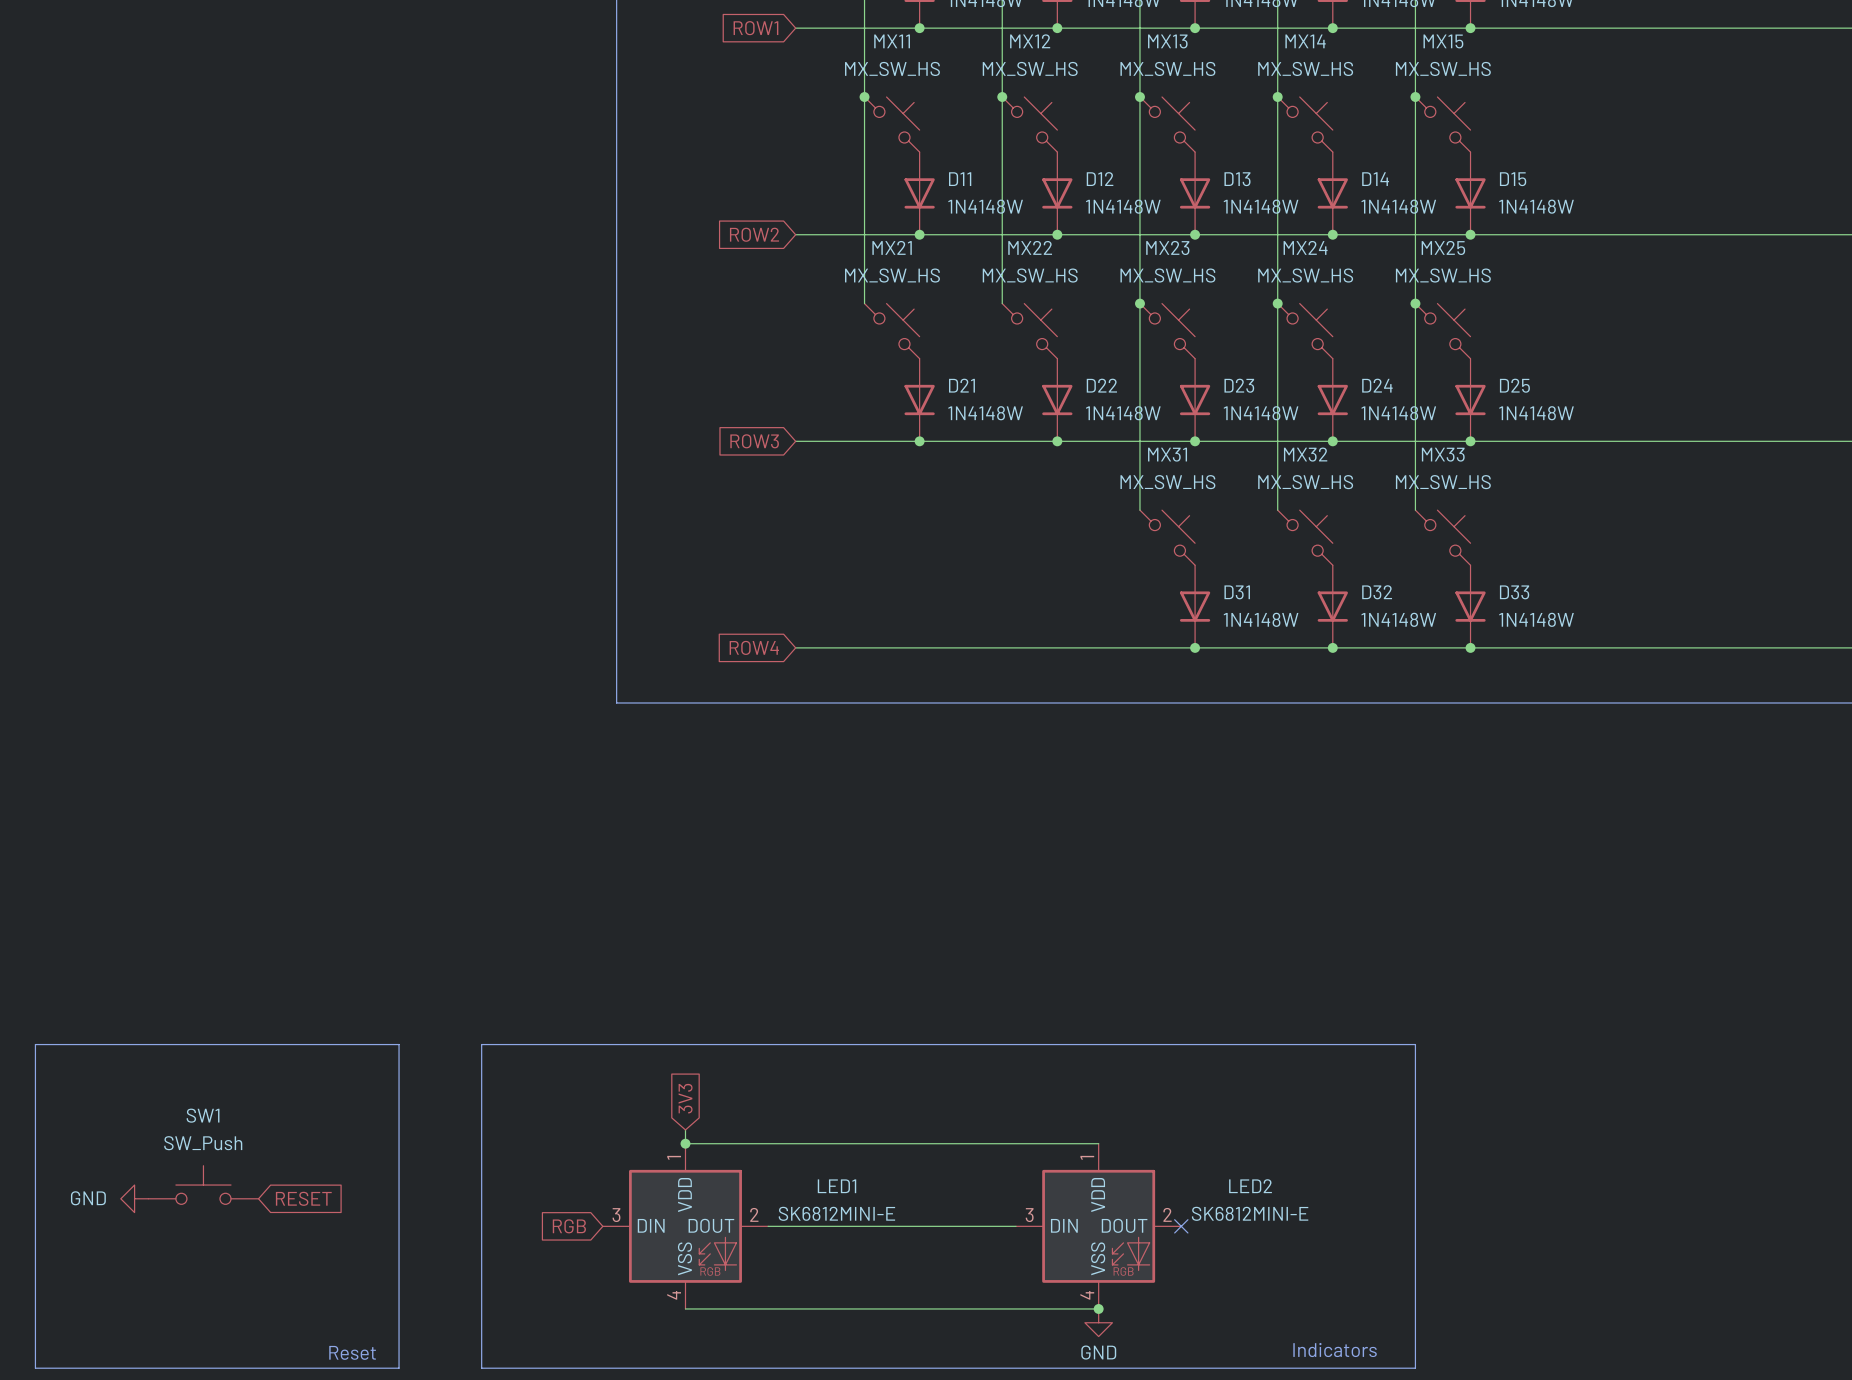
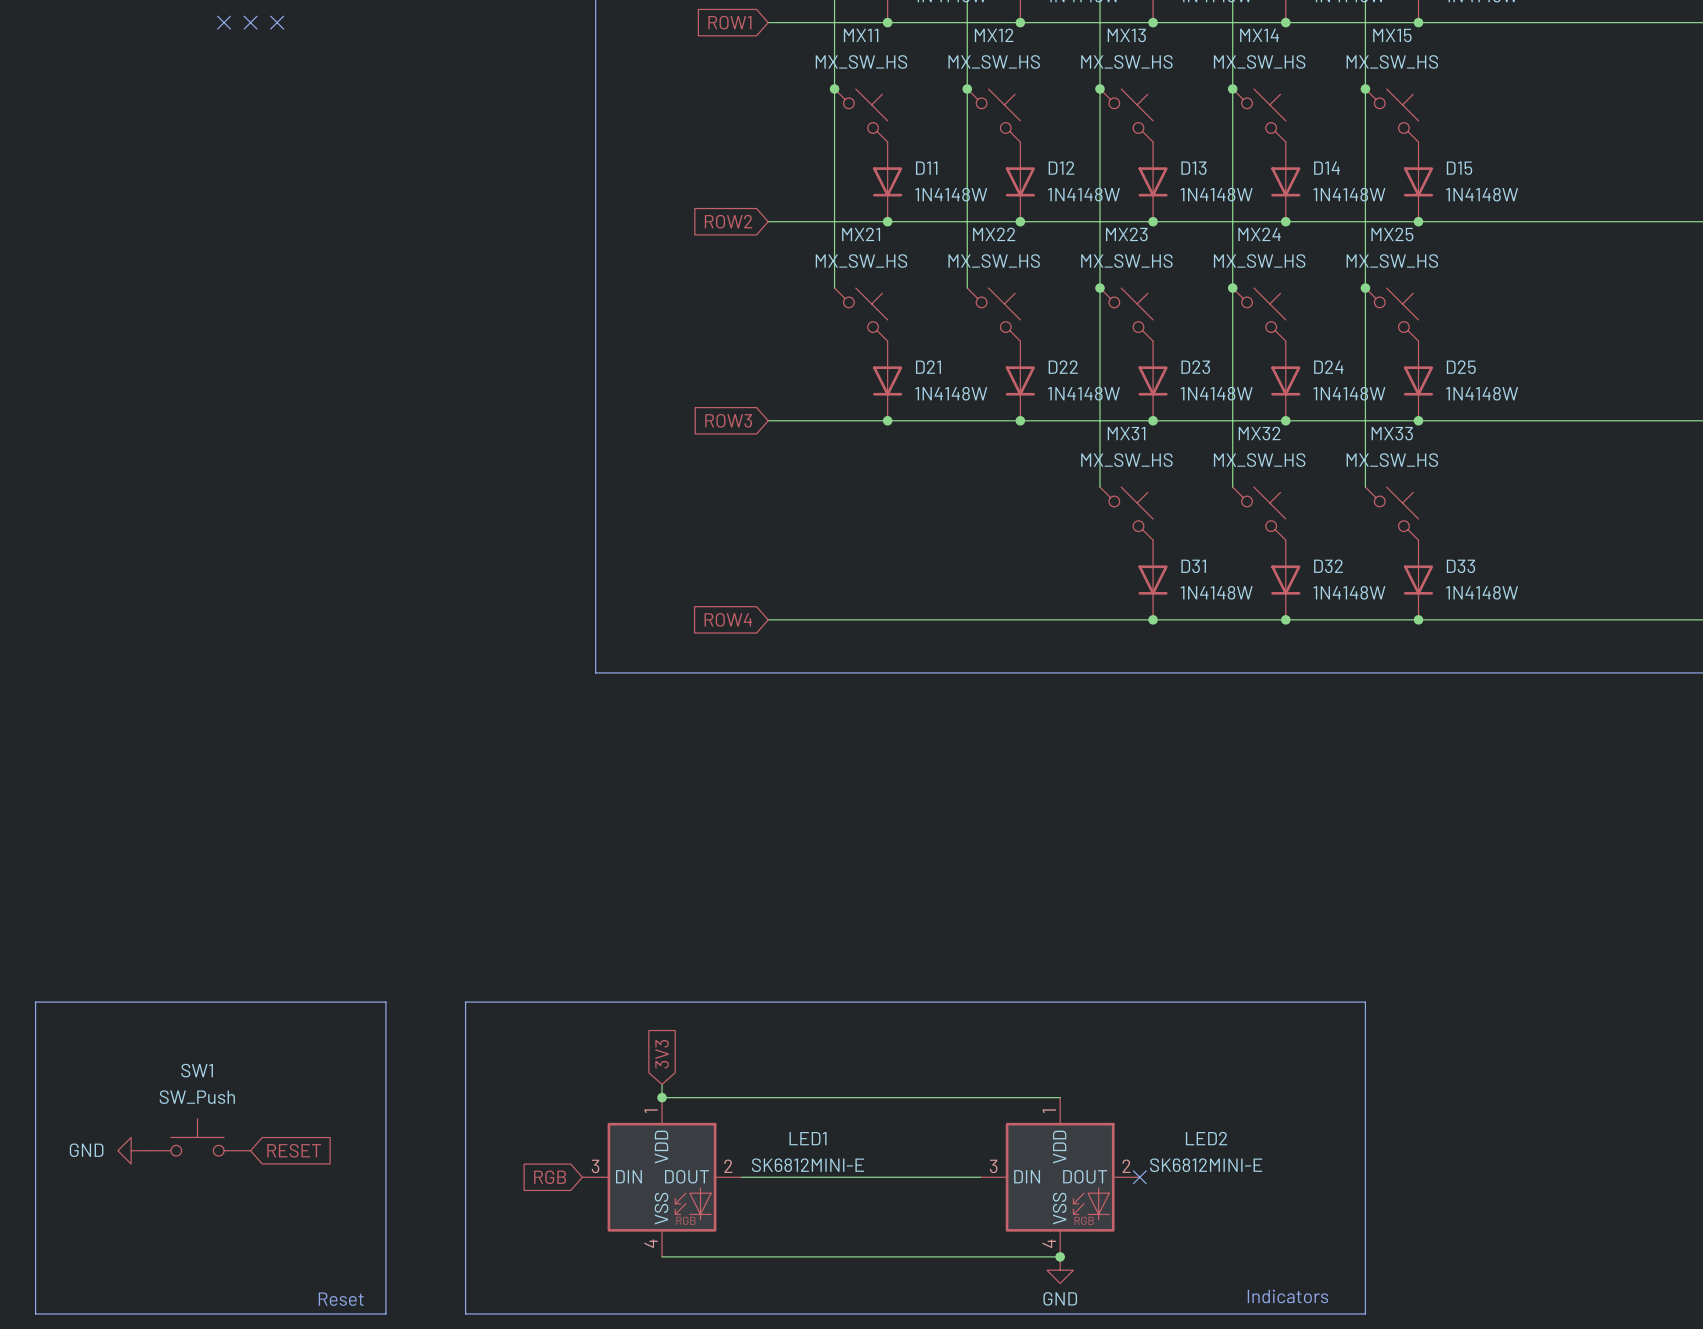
no-connect mark: none -> (224, 22)
no-connect mark: none -> (250, 22)
no-connect mark: none -> (277, 22)

